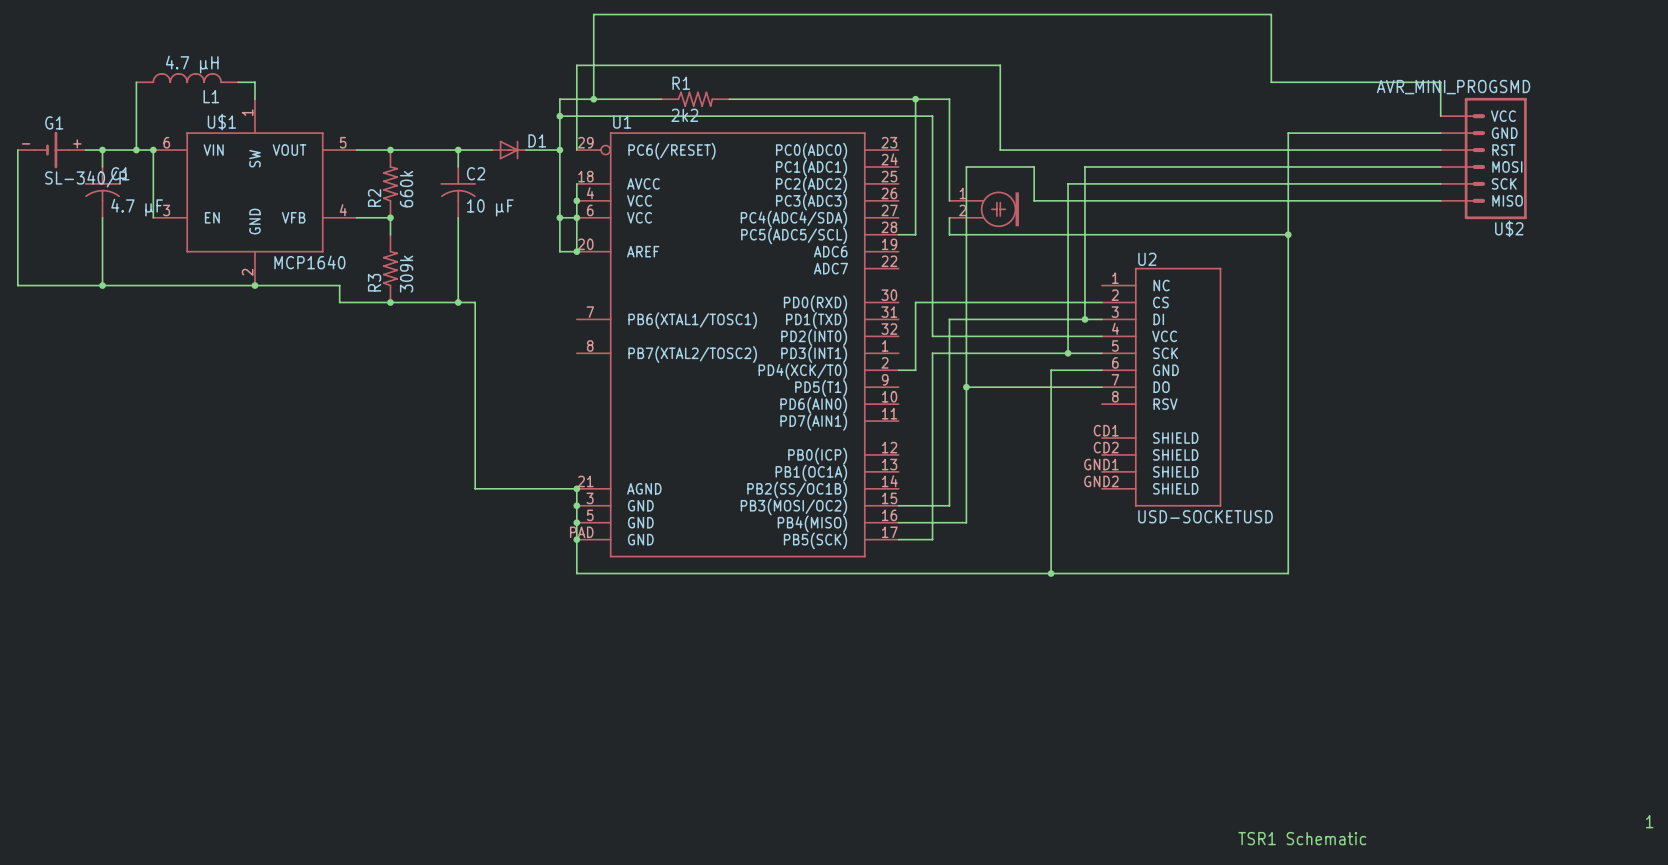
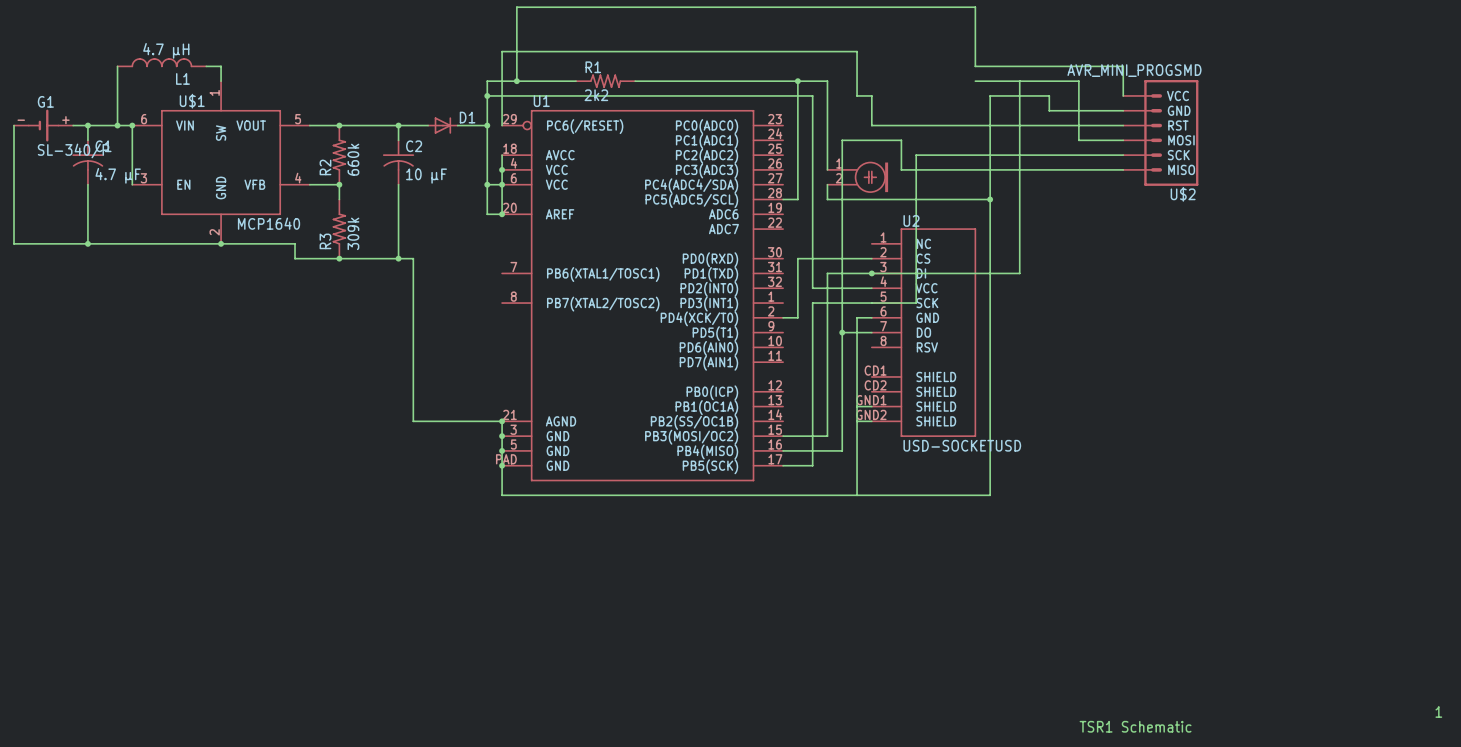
wire: (1118, 14) (1271, 14) (1271, 82) -> (975, 7) (975, 66) (1108, 66)
wire: (983, 65) (1000, 65) (1000, 116) -> (857, 51) (857, 95) (871, 95)
wire: (1288, 82) (1440, 82) (1440, 116) -> (1123, 66) (1123, 95)
wire: none -> (1019, 81) (1019, 273) (960, 273)
wire: (1440, 133) (1288, 133) (1288, 573) (1135, 573) -> (1123, 110) (1049, 110) (1049, 95) (990, 95) (990, 495)
wire: (1288, 150) (1440, 150) -> none
U$2 position: (1483, 158) -> (1160, 132)
wire: (1237, 166) (1084, 166) (1084, 319) -> (1078, 140) (1078, 81) (975, 81)
wire: (1288, 166) (1440, 166) -> none
wire: (1068, 183) (1068, 353) -> (930, 155) (916, 155) (916, 303)
wire: (1288, 183) (1440, 183) -> none
wire: (1288, 200) (1440, 200) -> none
wire: (1135, 234) (1288, 234) -> none
junction: none -> (990, 199)
junction: (1288, 234) -> none
wire: (1000, 302) (1101, 302) -> none
junction: none -> (871, 273)
junction: (1084, 319) -> none
wire: (1000, 336) (1101, 336) -> none
wire: (1051, 353) (1101, 353) -> none
junction: (1068, 353) -> none
wire: none -> (871, 317) (857, 317) (857, 495)
wire: (1101, 370) (1051, 370) (1051, 573) -> none
wire: (1000, 387) (1101, 387) -> none
U2 position: (1161, 387) -> (923, 332)
wire: none -> (857, 406) (871, 406)
wire: none -> (857, 421) (871, 421)
junction: (1051, 573) -> none

